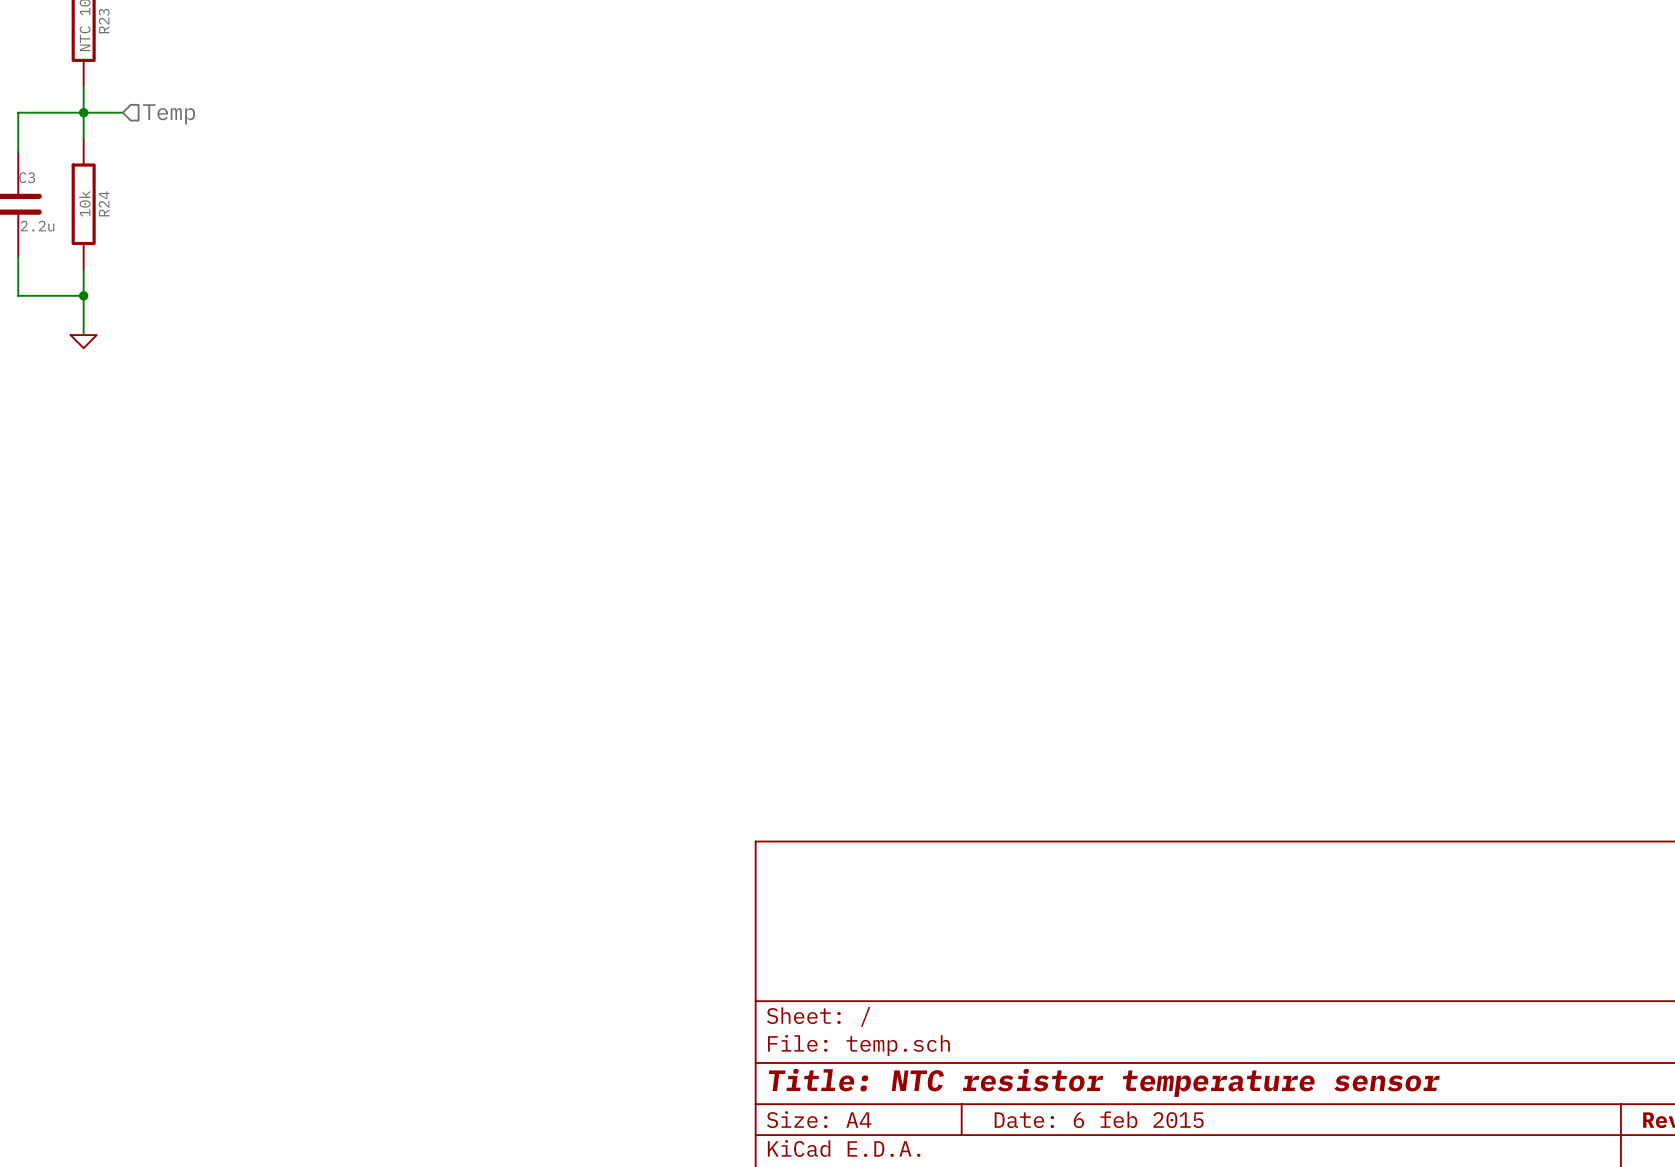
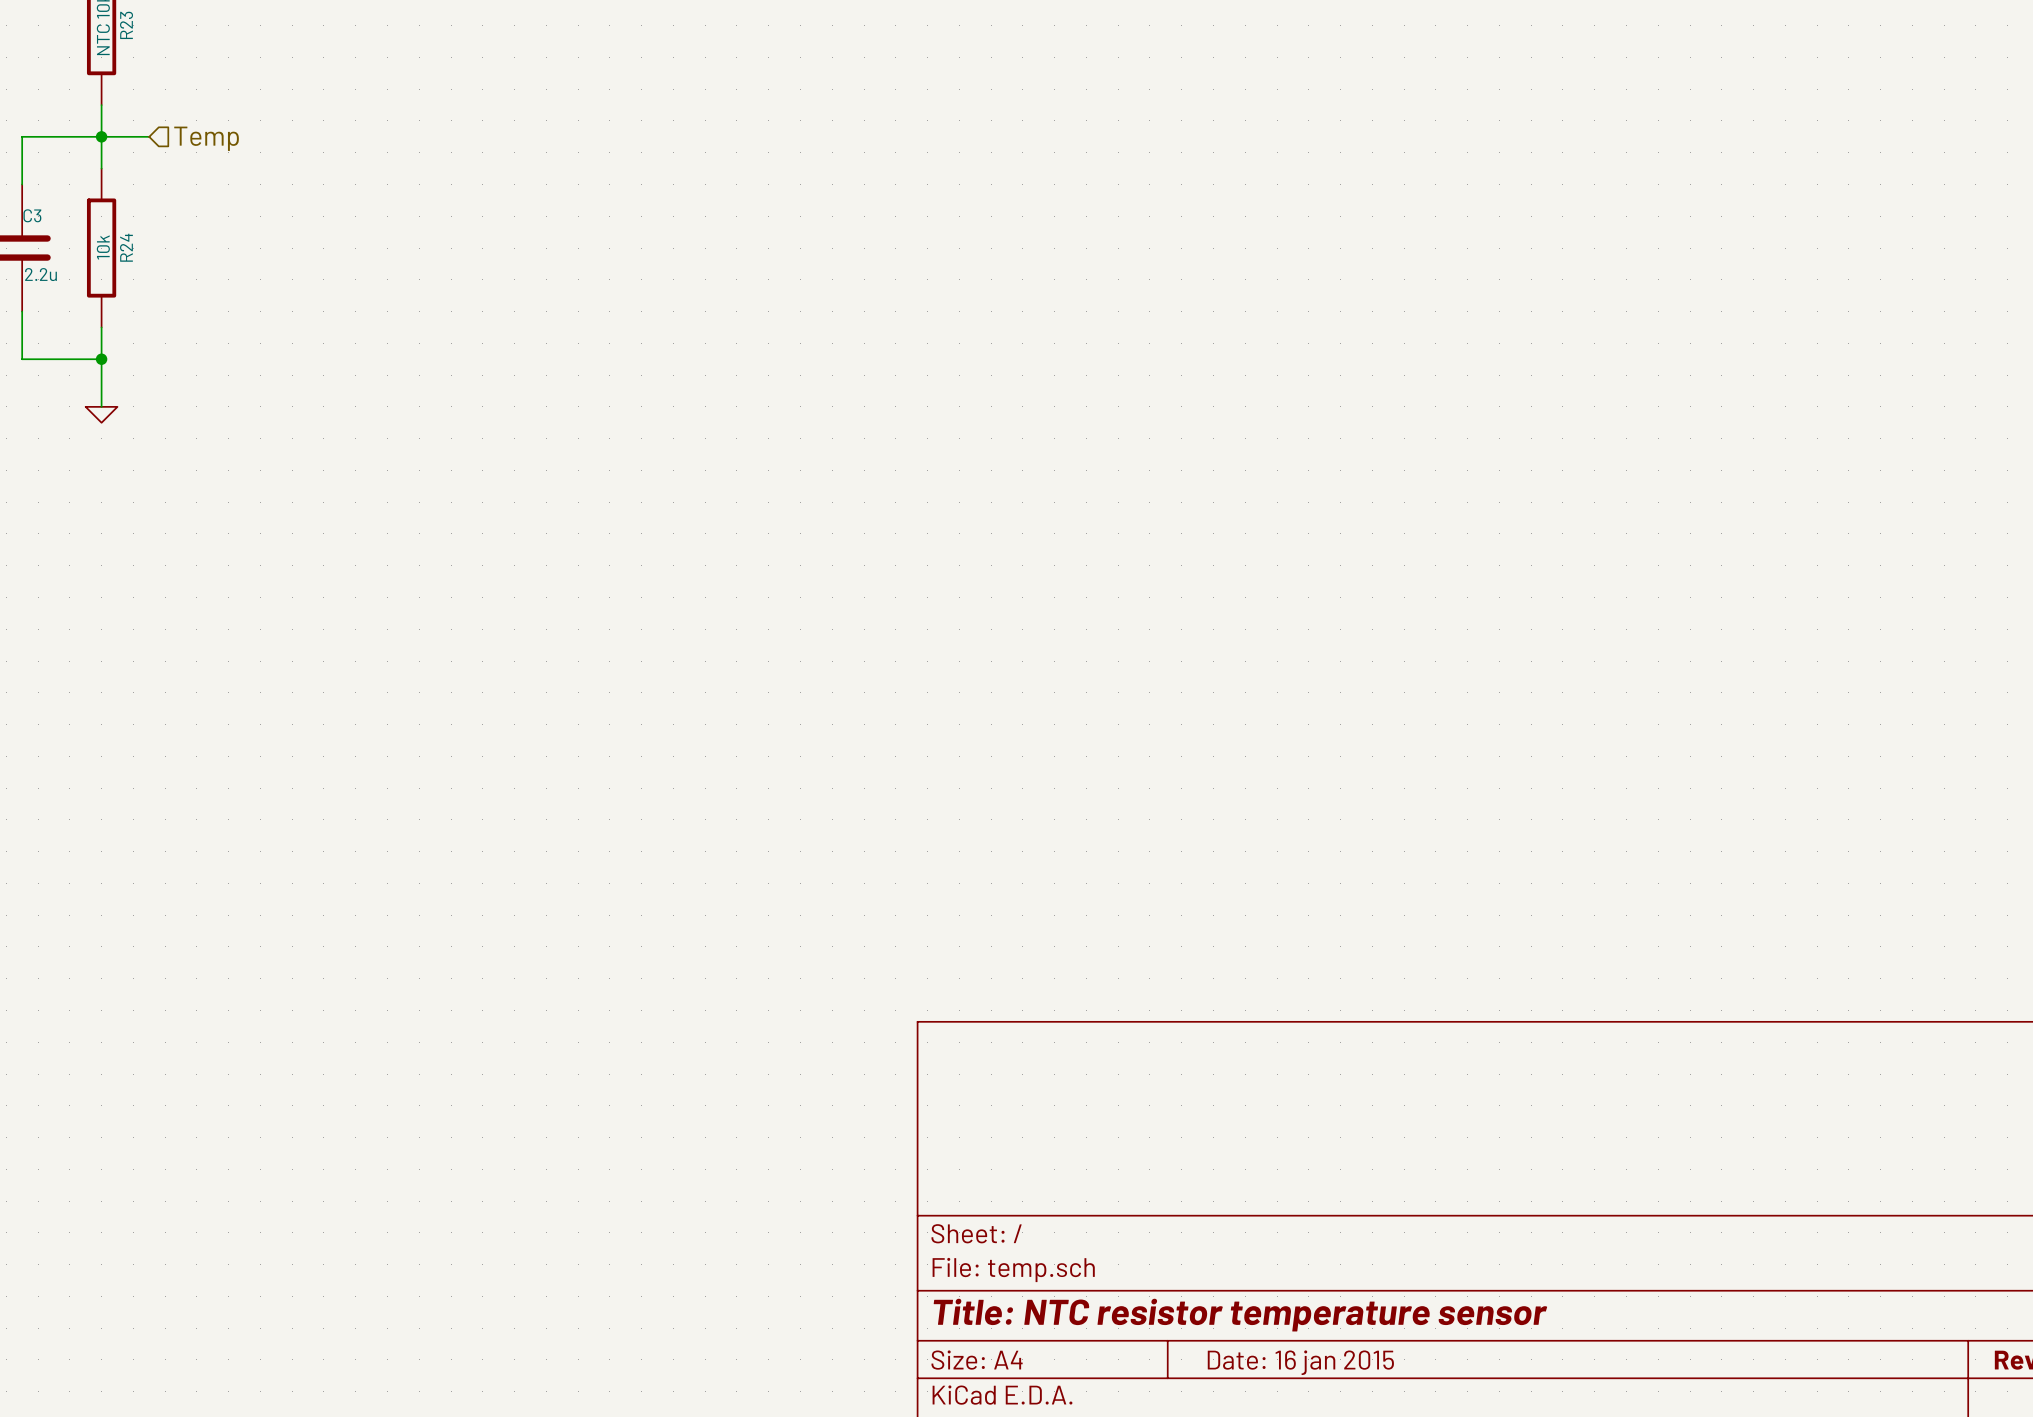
title block: Date: 6 feb 2015 (1099, 1119) -> Date: 16 jan 2015 (1300, 1362)

